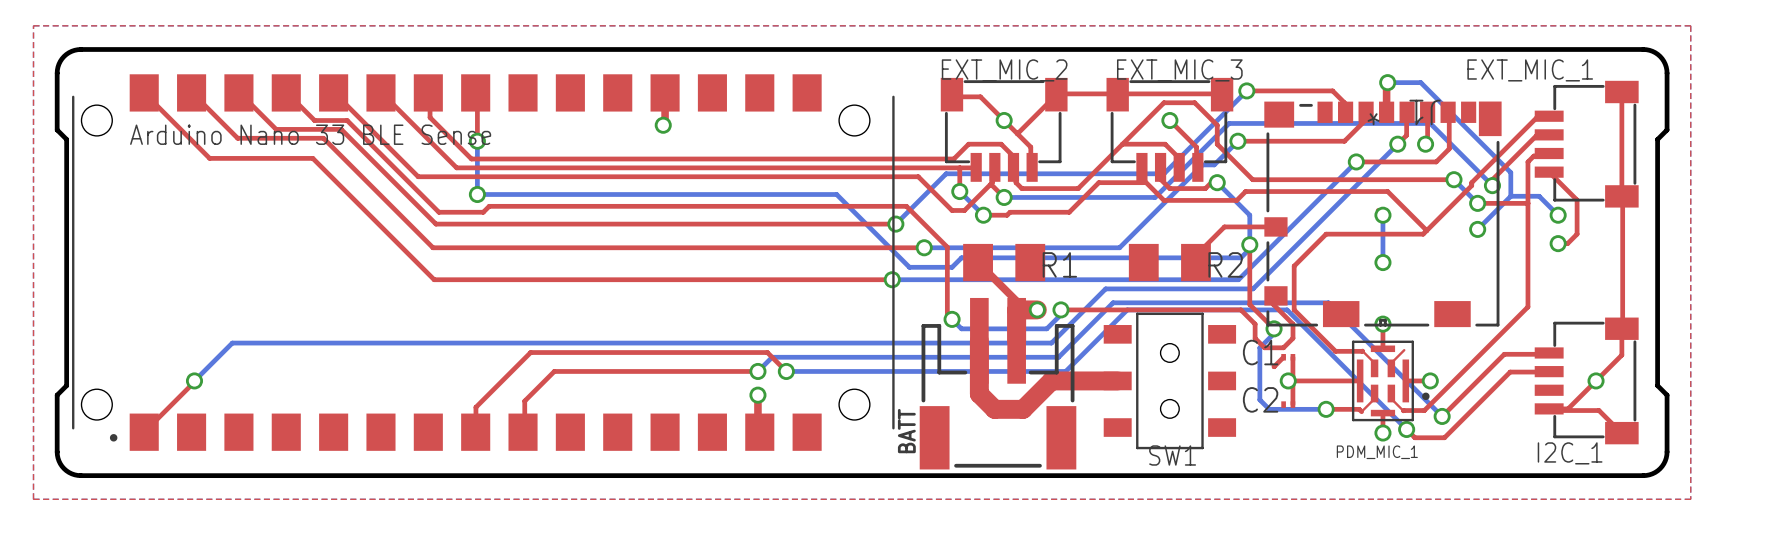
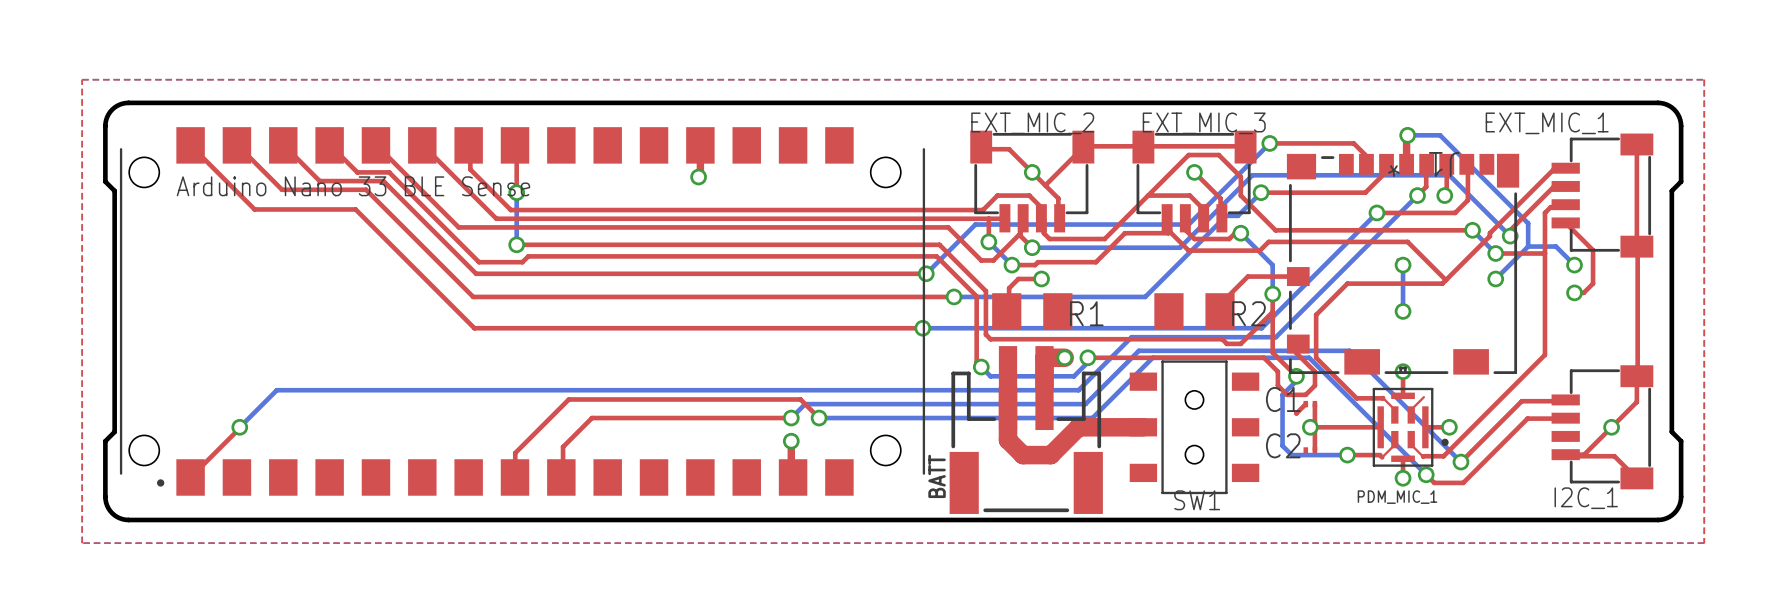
top track: none -> (516, 244) (939, 244) (985, 291) (985, 334) (990, 339) (1222, 339) (1226, 343) (1240, 343) (1272, 312)
bottom track: (477, 194) (836, 194) (909, 267) (952, 267) (961, 257) (1240, 257) (1249, 248) (1249, 244) -> none
via: none -> (1041, 278)
top track: (978, 262) (1016, 301) (1016, 309) -> (1006, 311) (1009, 309) (1009, 288) (1018, 278) (1041, 278)

